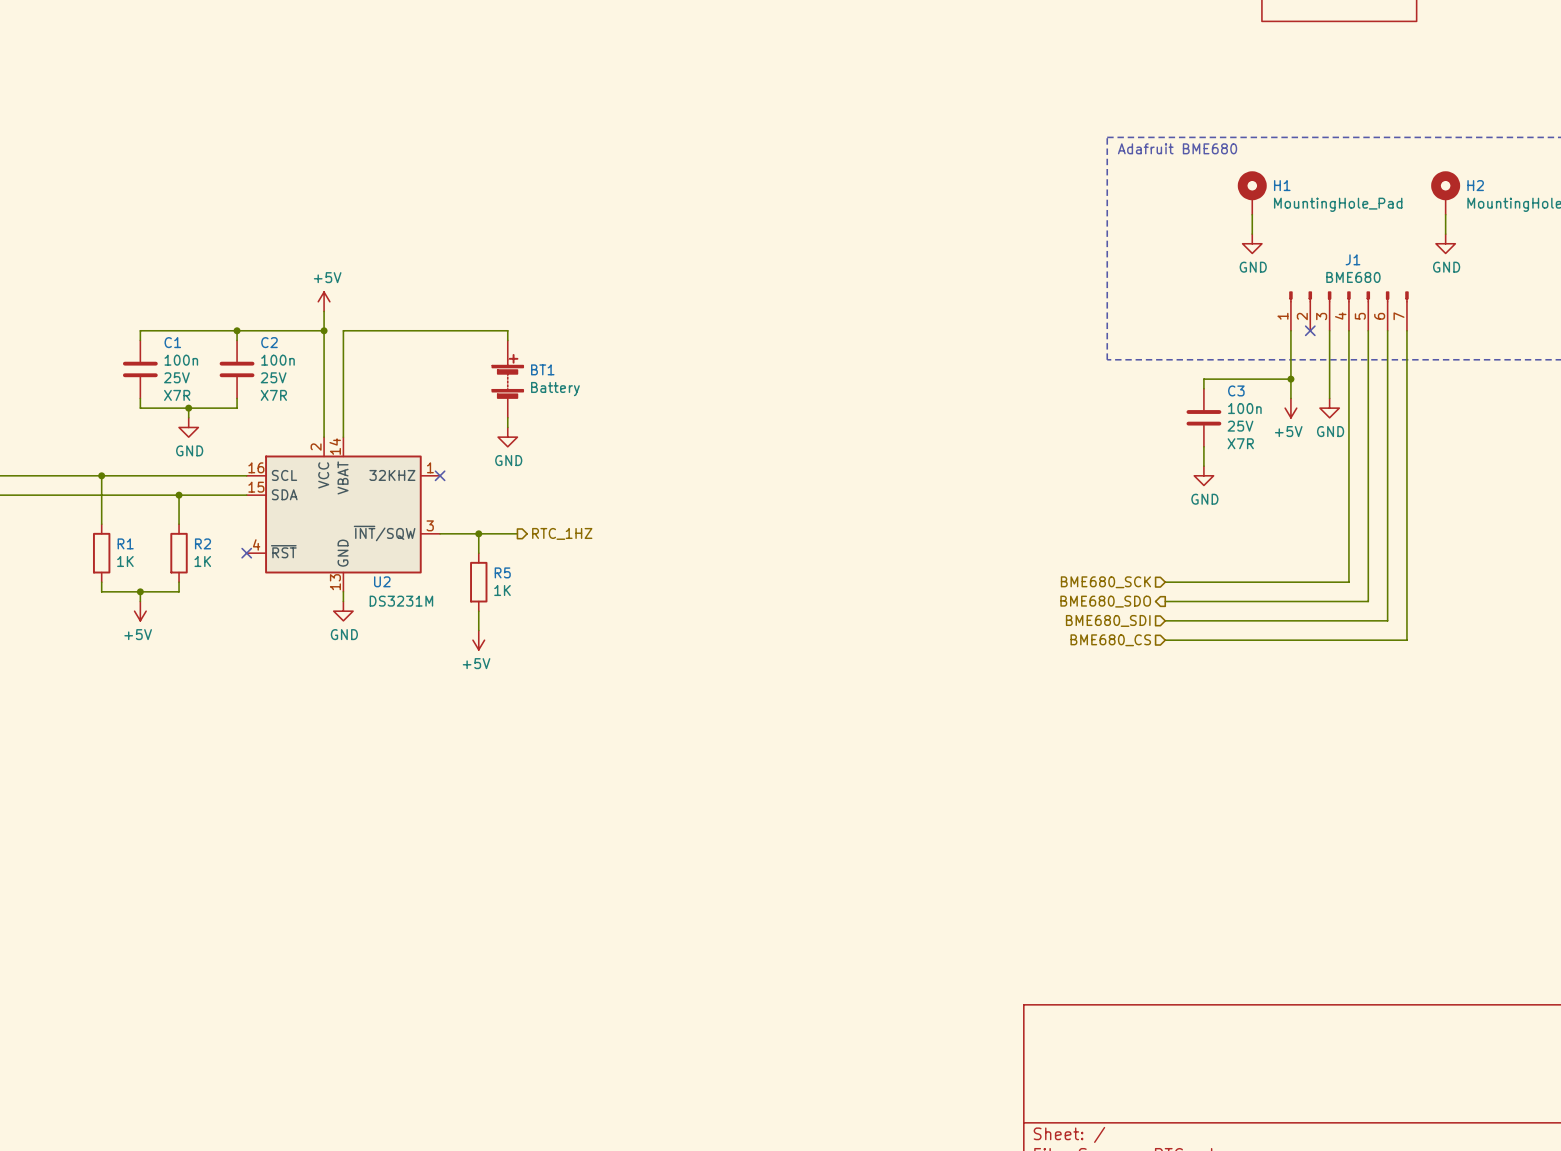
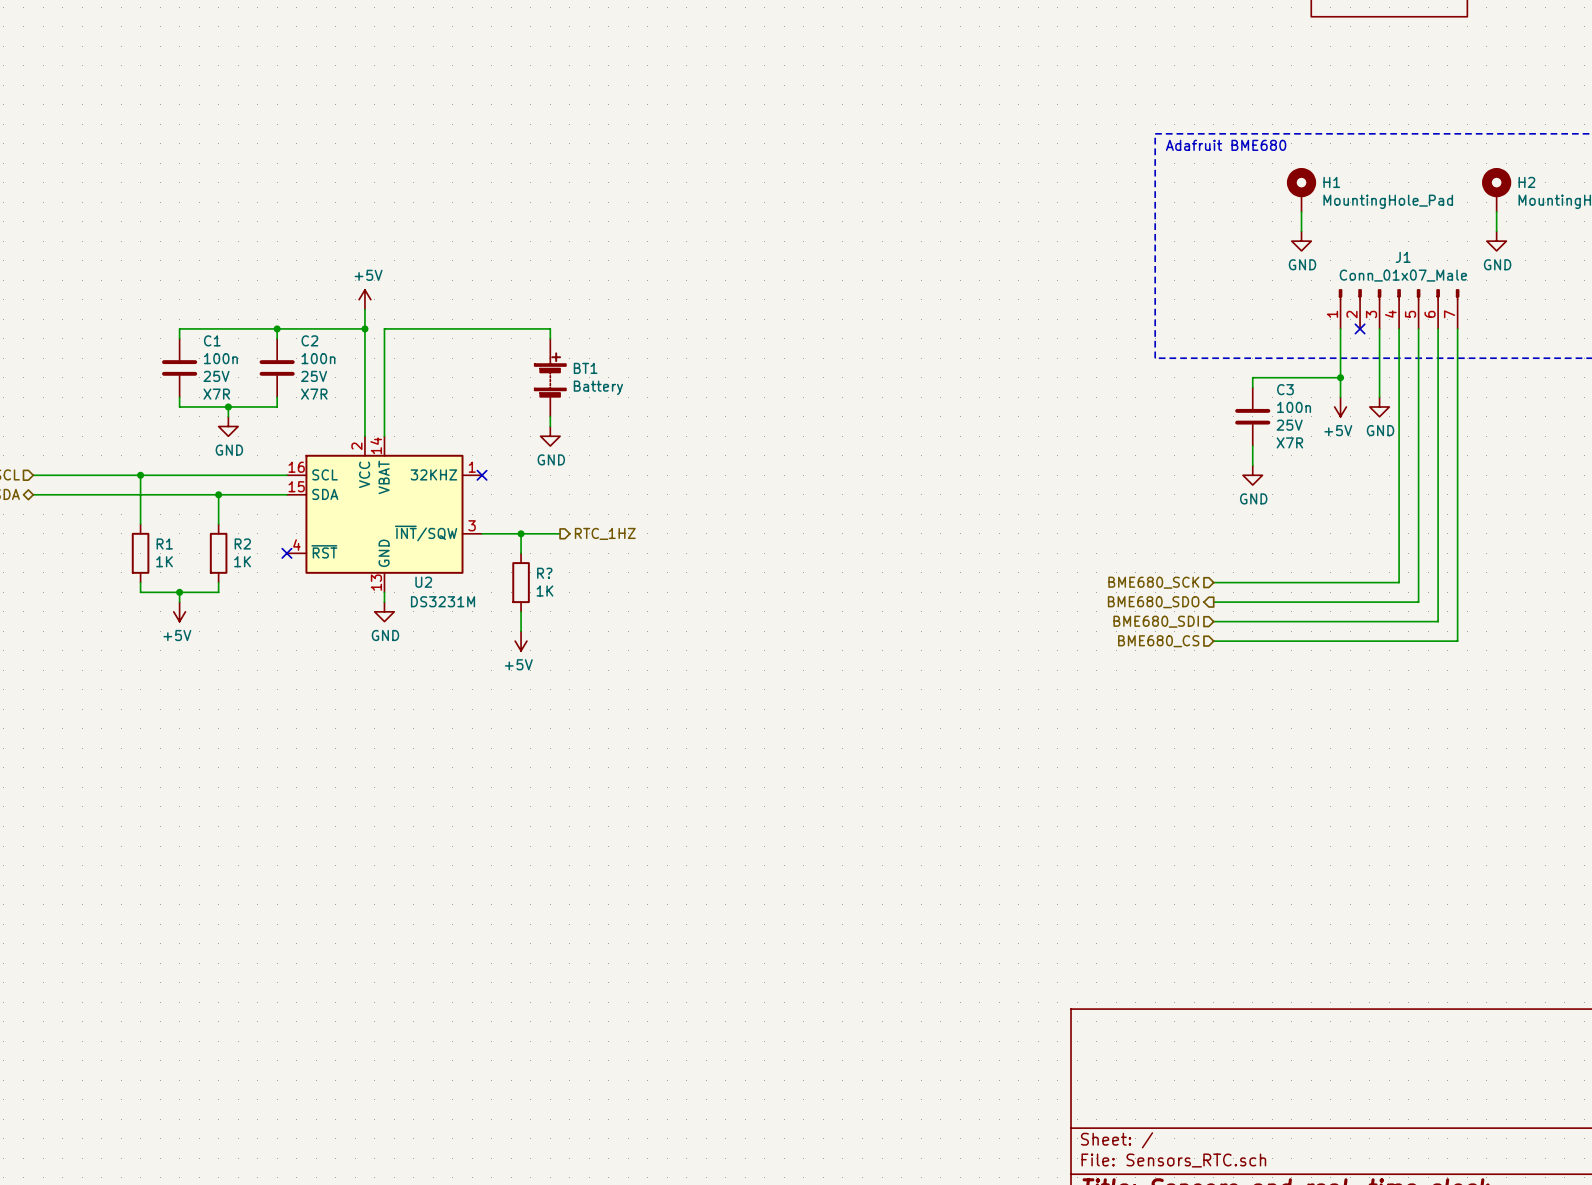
J1 value: BME680 (1353, 277) -> Conn_01x07_Male (1403, 275)
R5 name: R5 (502, 572) -> R? (544, 573)

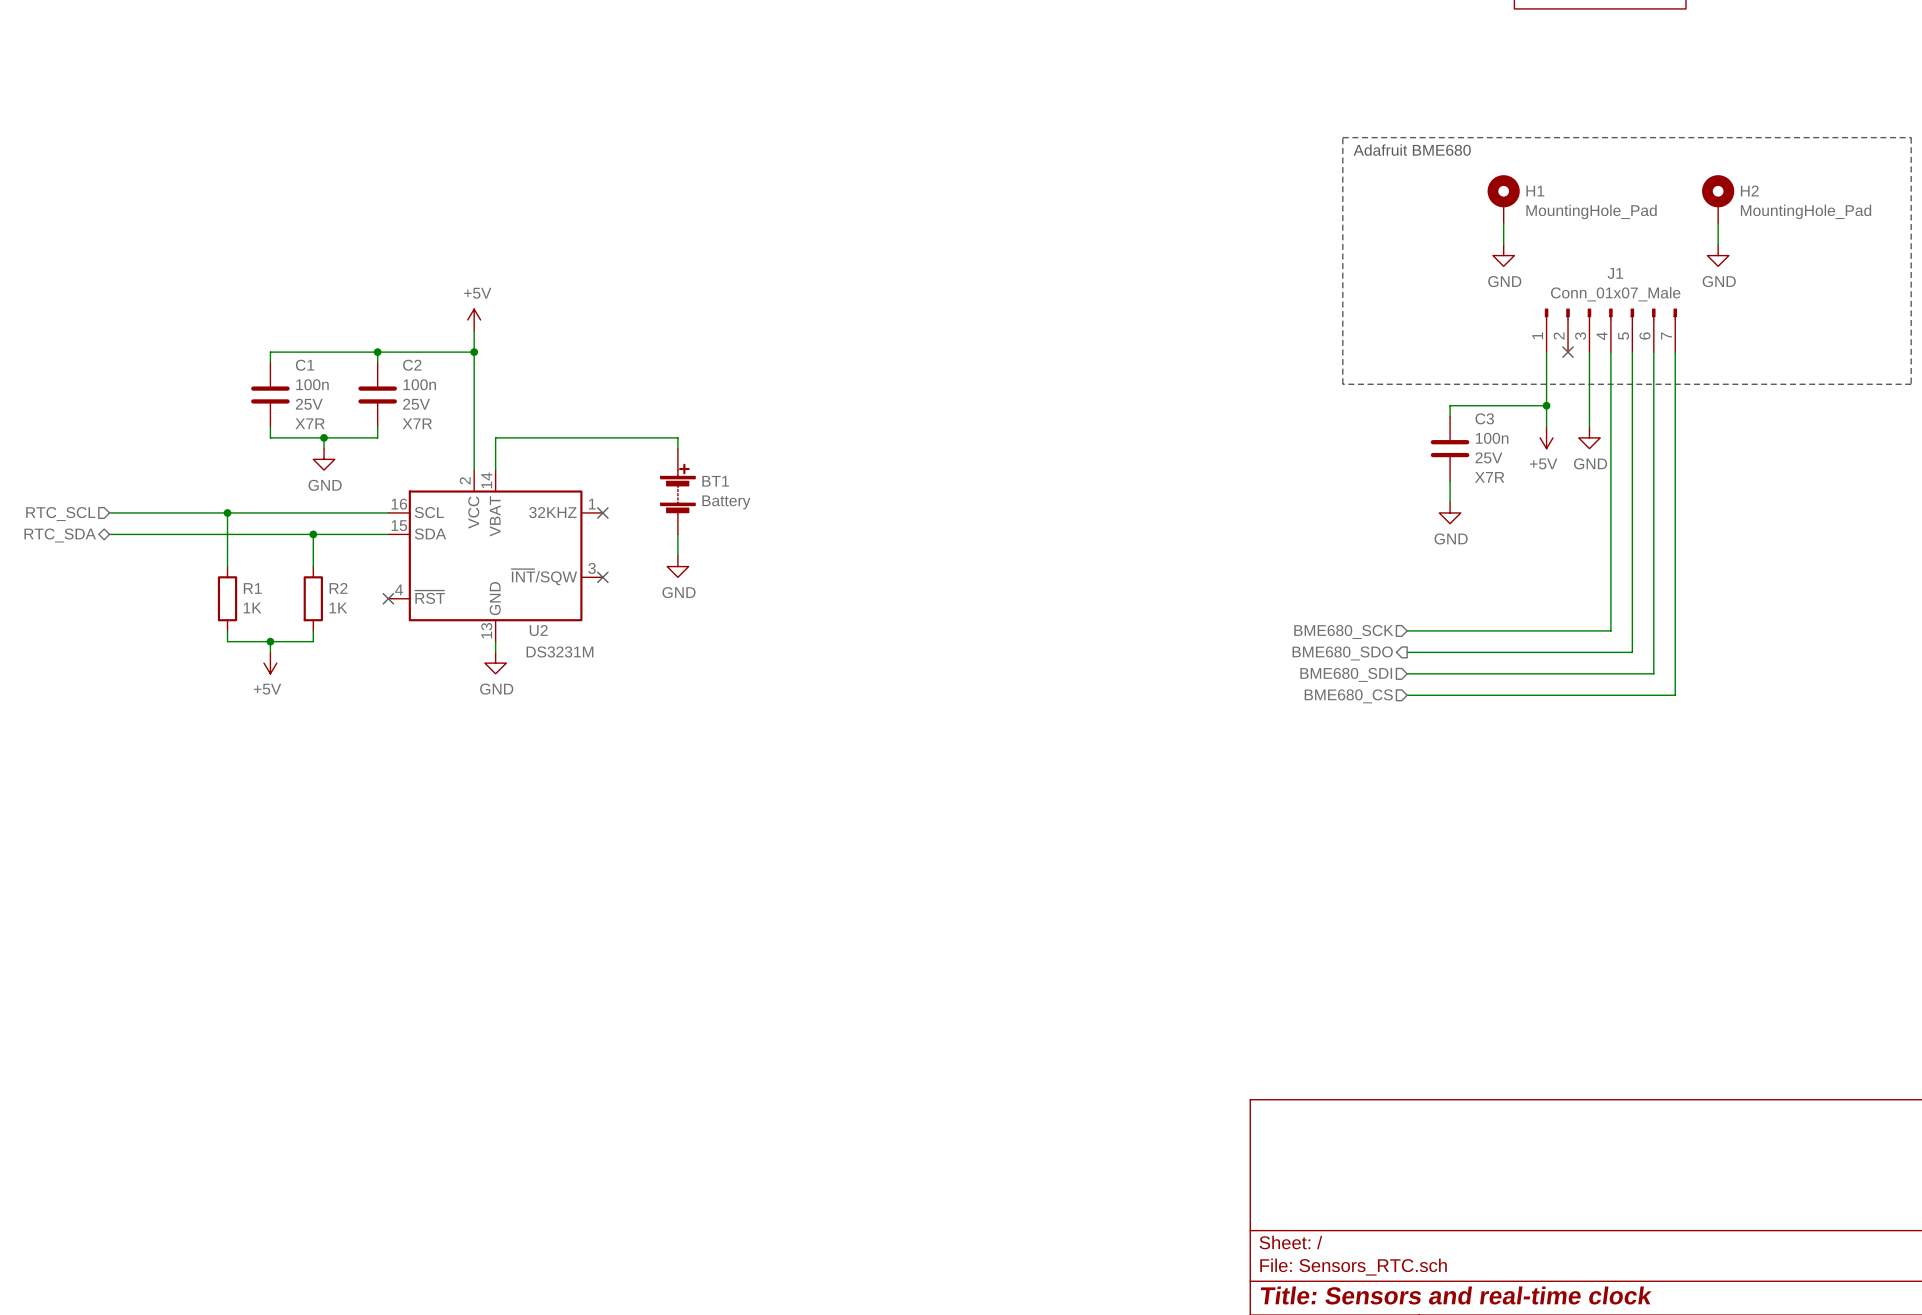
wire: (550, 338) (550, 328) (384, 328) (384, 406) -> (677, 448) (677, 437) (495, 437)
BT1 position: (550, 377) -> (677, 491)
power symbol position: GND (550, 436) -> GND (677, 566)
wire: (482, 533) (560, 533) -> none
no-connect mark: none -> (602, 577)
wire: (521, 533) (521, 553) -> (677, 534) (677, 555)
junction: (521, 533) -> none
hierarchical label: RTC_1HZ (605, 533) -> none
R?: 1K (521, 582) -> none
wire: (521, 611) (521, 631) -> none
power symbol: +5V (521, 641) -> none

